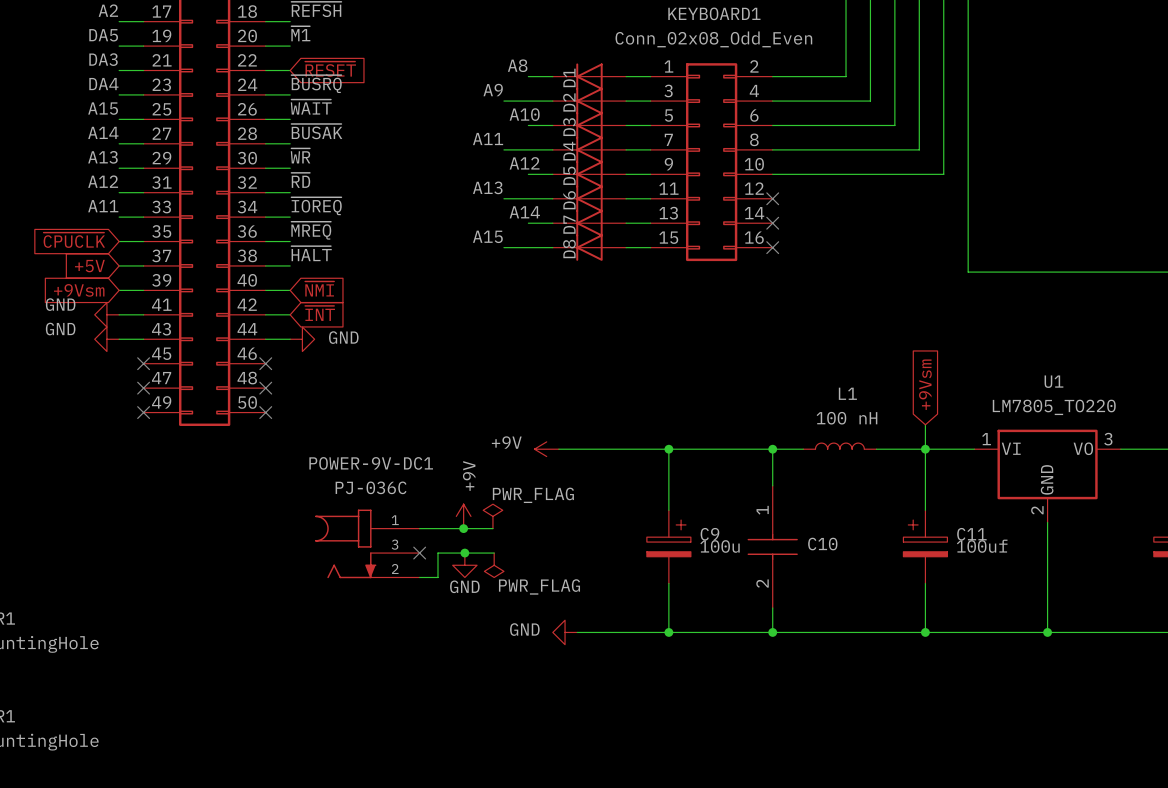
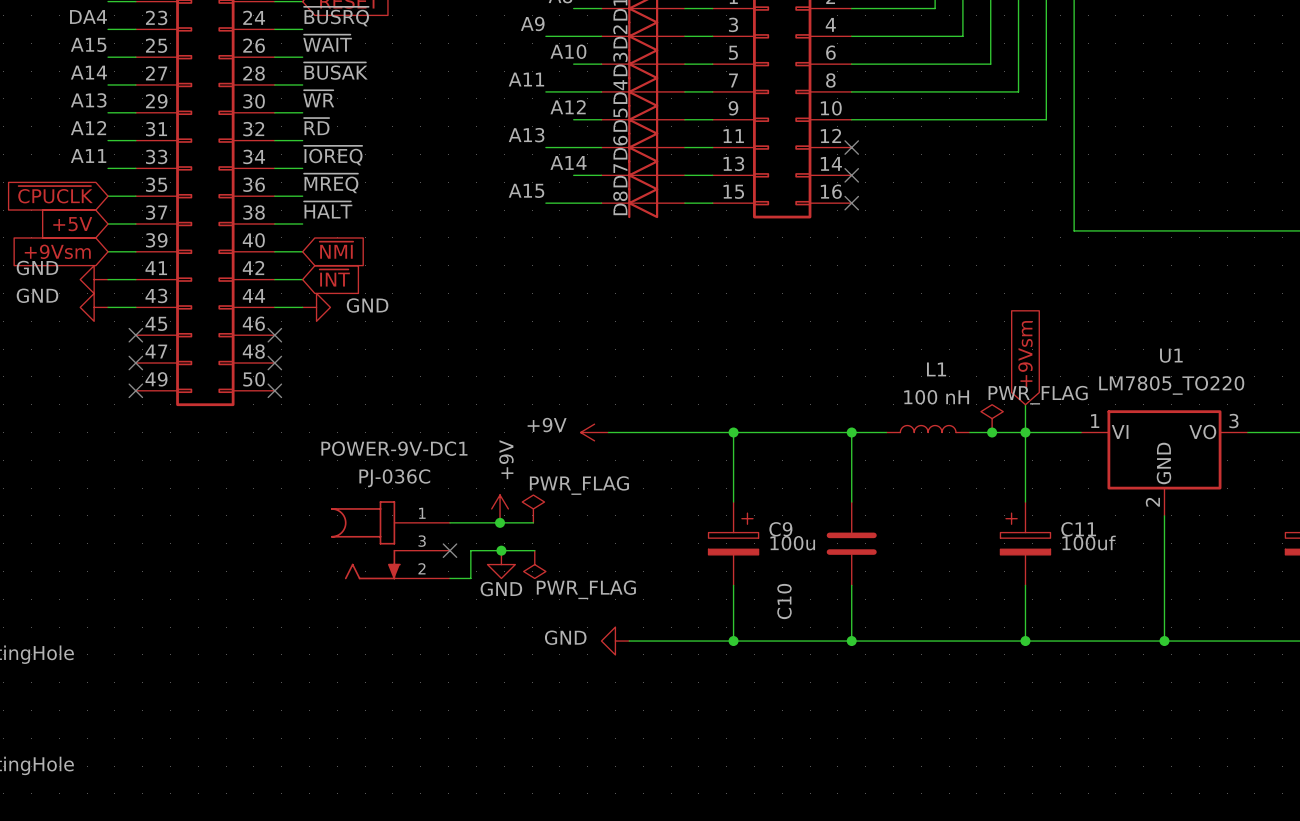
power symbol: none -> PWR_FLAG (992, 418)
junction: none -> (992, 432)
C10 symbol: [747, 485, 798, 609] -> [826, 502, 877, 586]
C10 name position: C10 (822, 544) -> C10 (784, 601)

